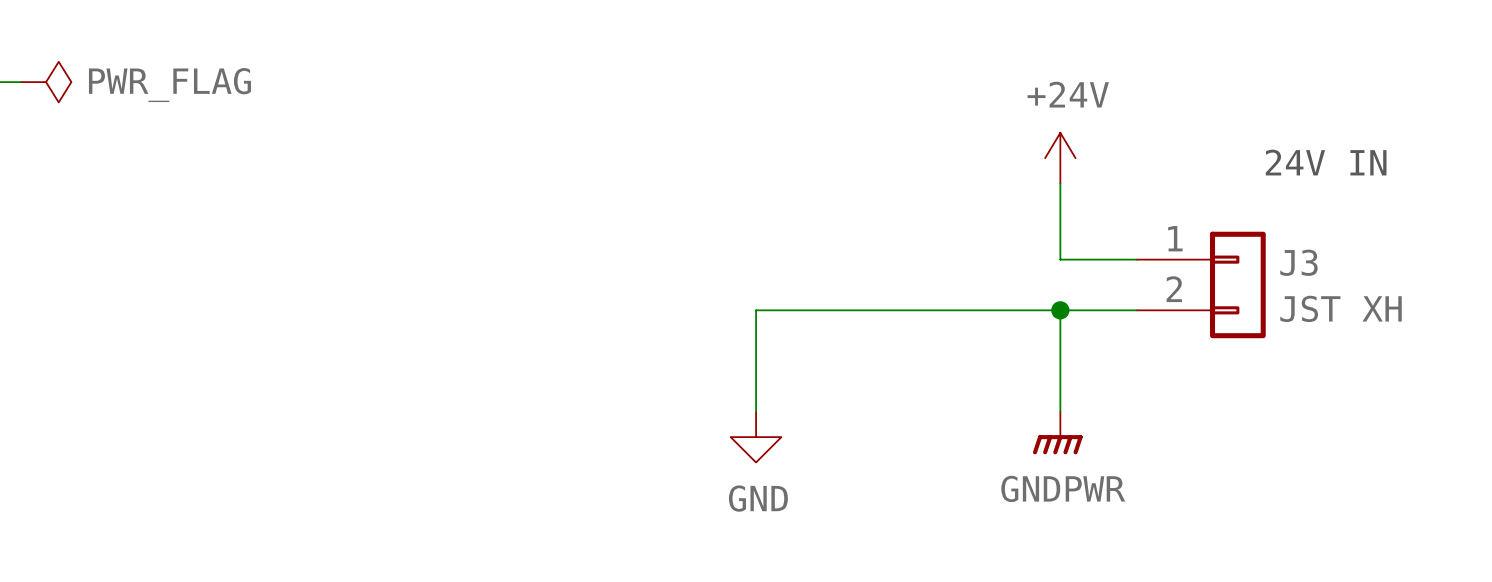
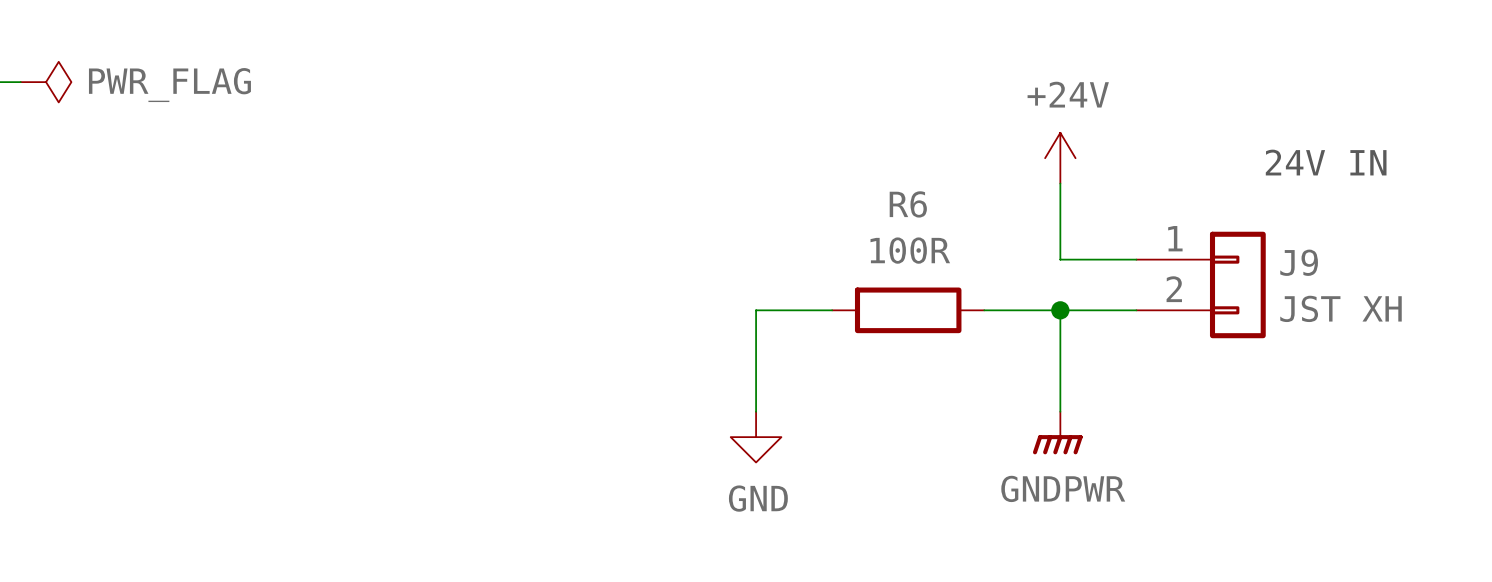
J3 name: J3 (1298, 262) -> J9 (1299, 262)
wire: (832, 310) (984, 310) -> none
R6: none -> 100R (908, 310)

